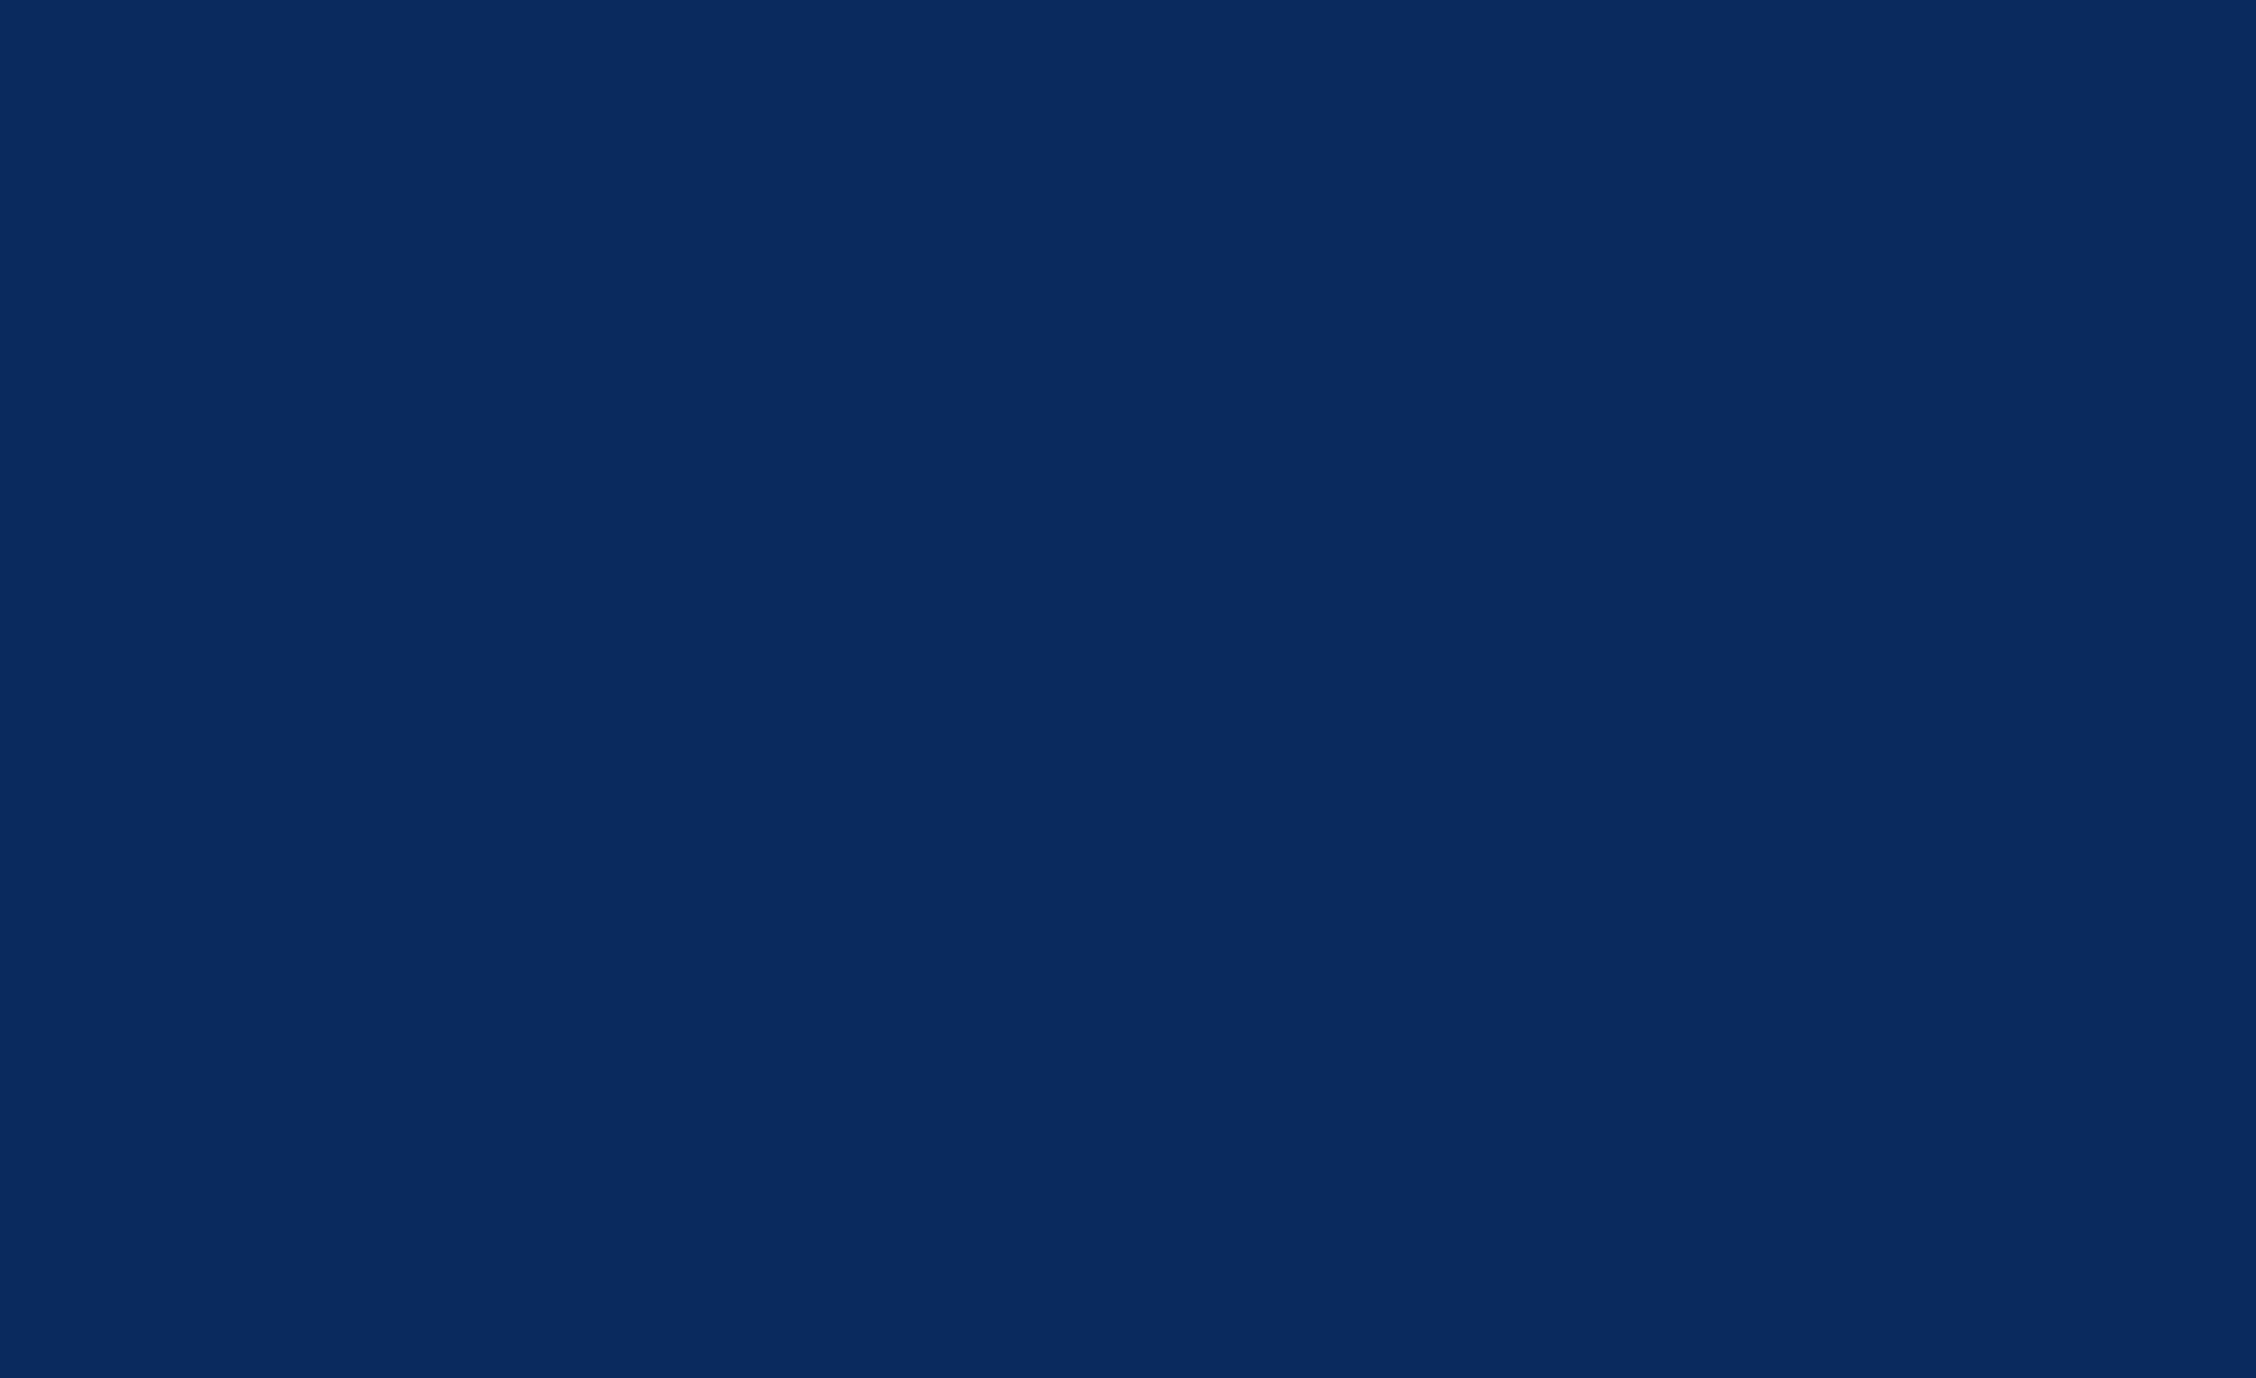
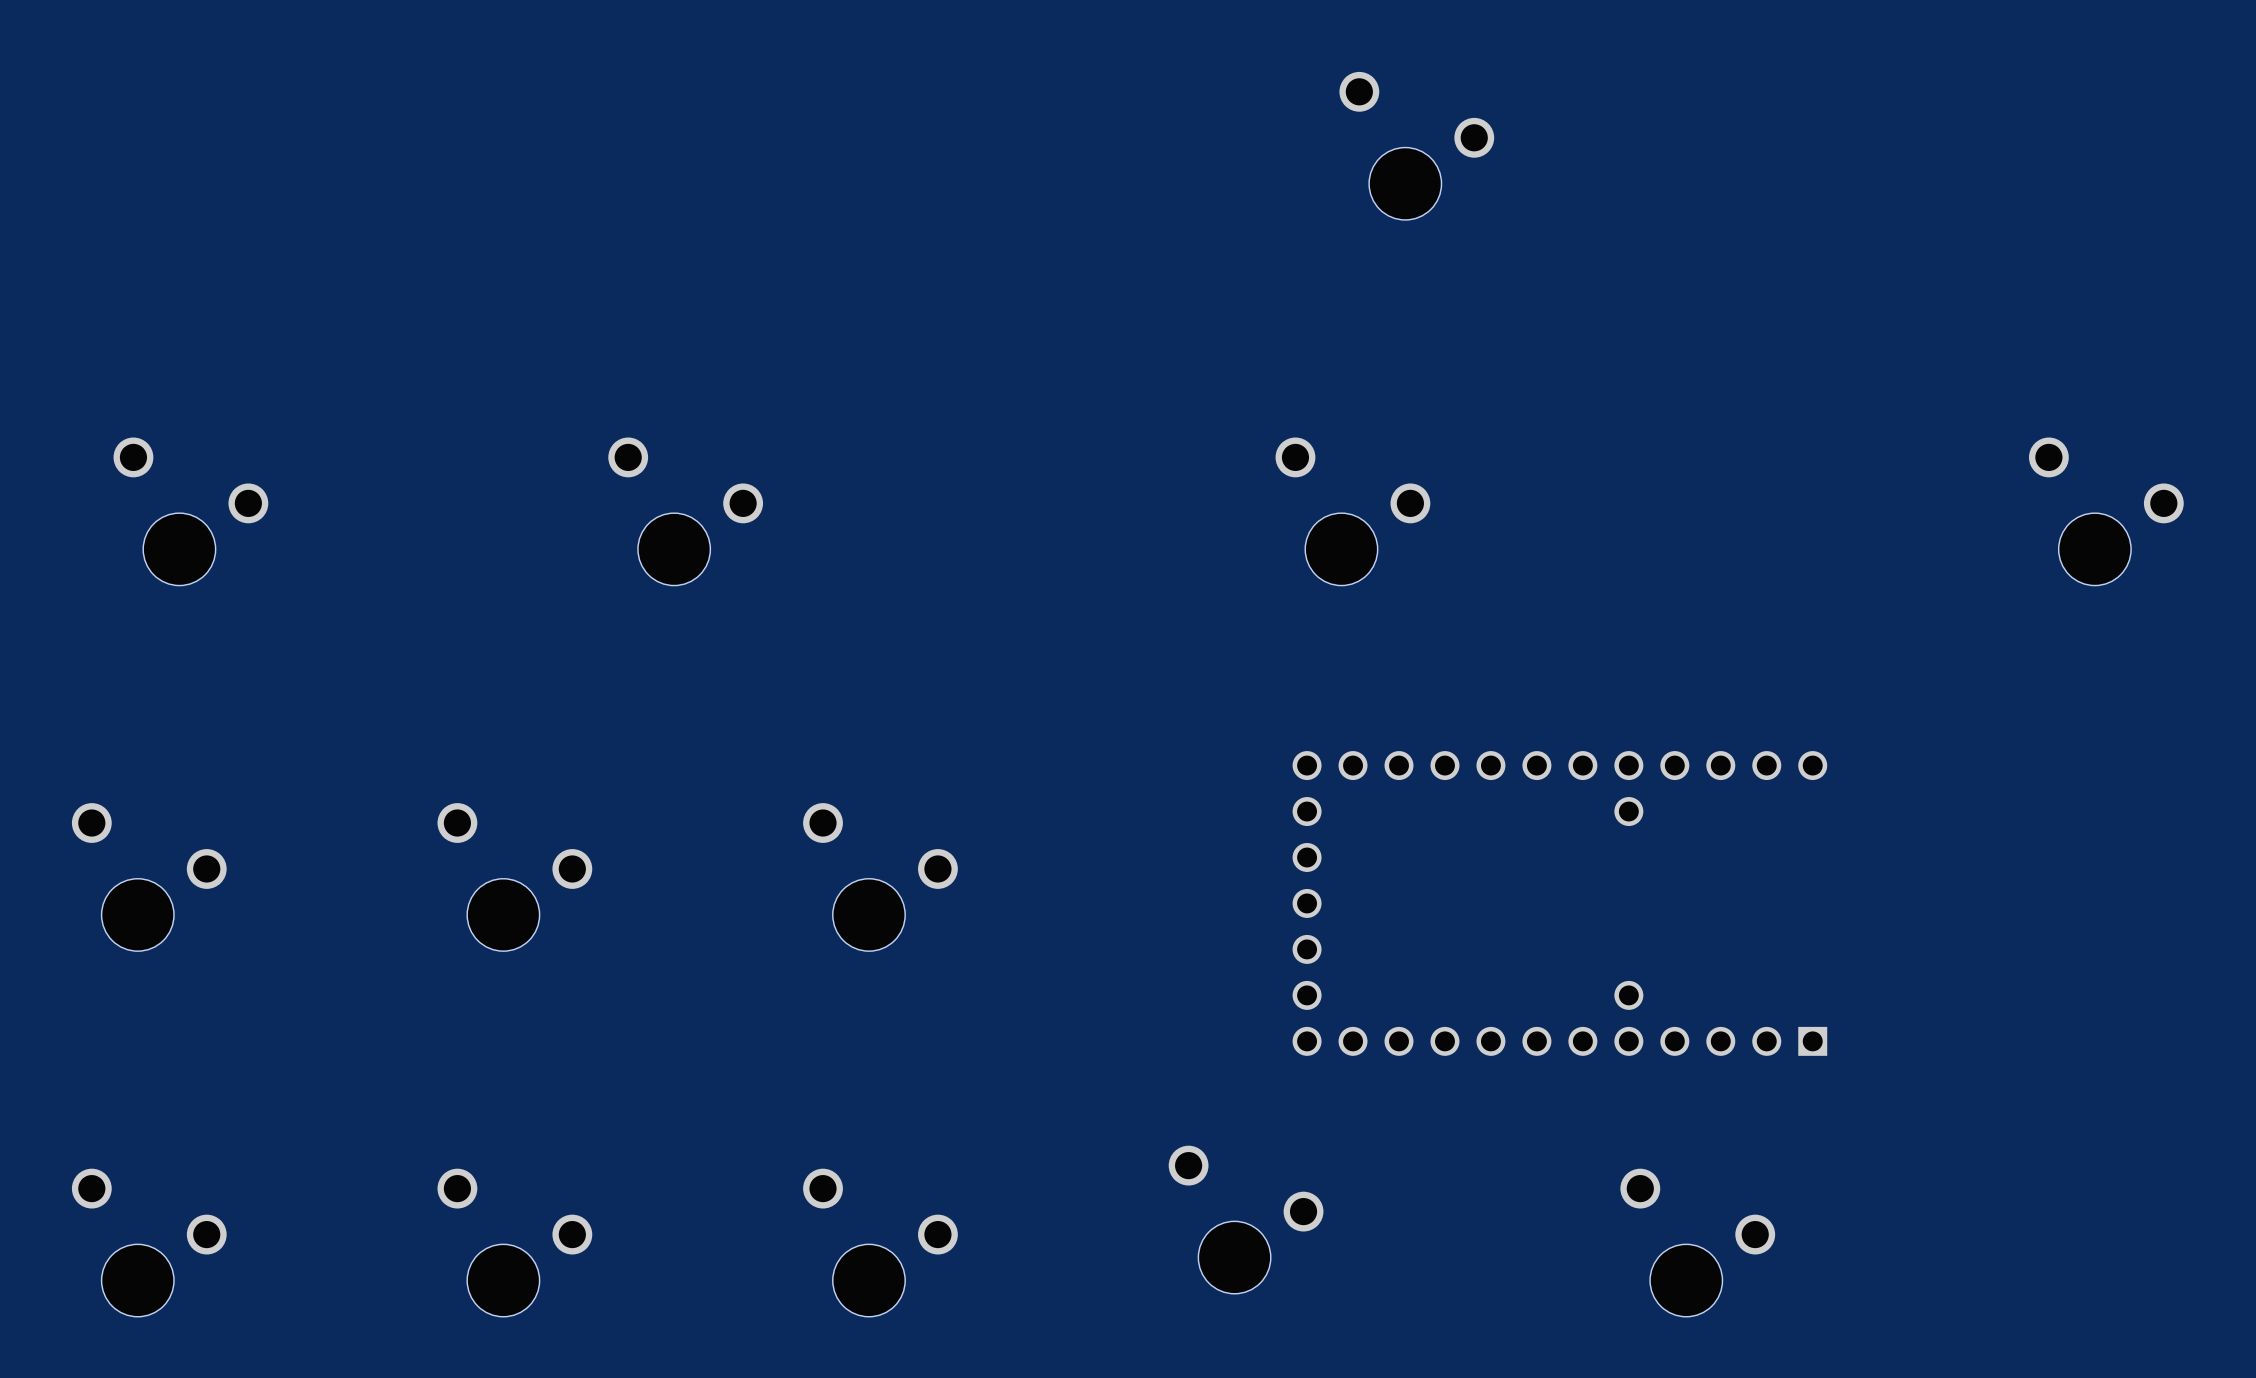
part: none -> (1416, 145)
part: none -> (190, 511)
part: none -> (685, 511)
part: none -> (1352, 511)
part: none -> (2106, 511)
part: none -> (149, 877)
part: none -> (514, 877)
part: none -> (880, 877)
part: none -> (1559, 903)
part: none -> (1246, 1219)
part: none -> (149, 1242)
part: none -> (514, 1242)
part: none -> (880, 1242)
part: none -> (1697, 1242)

